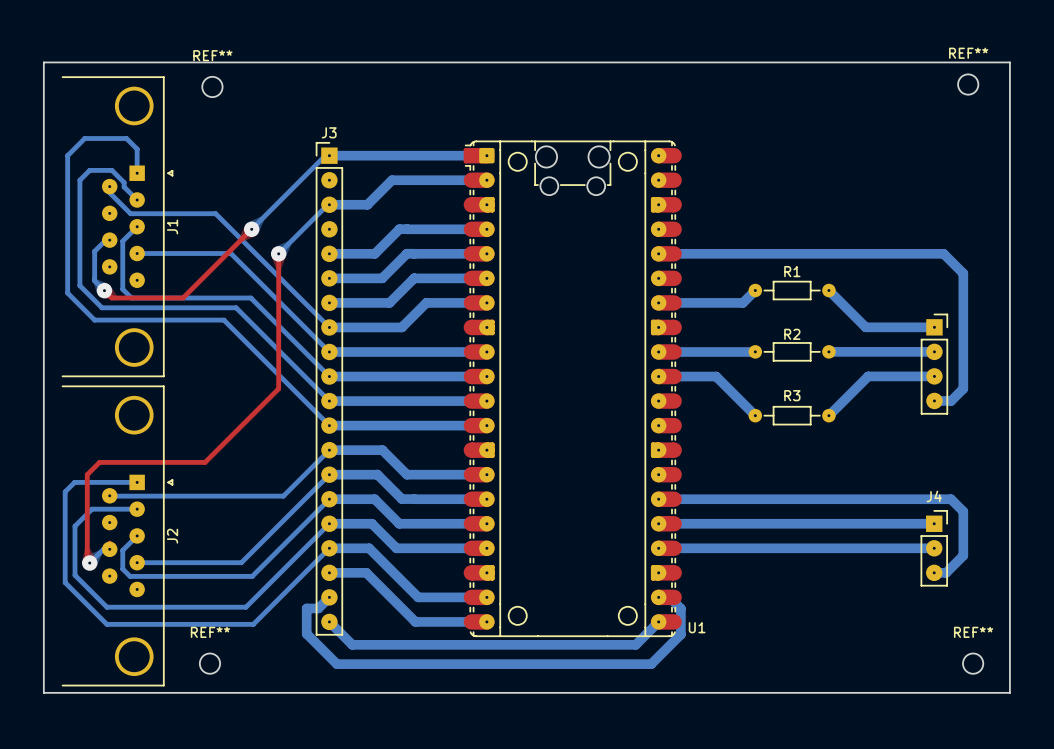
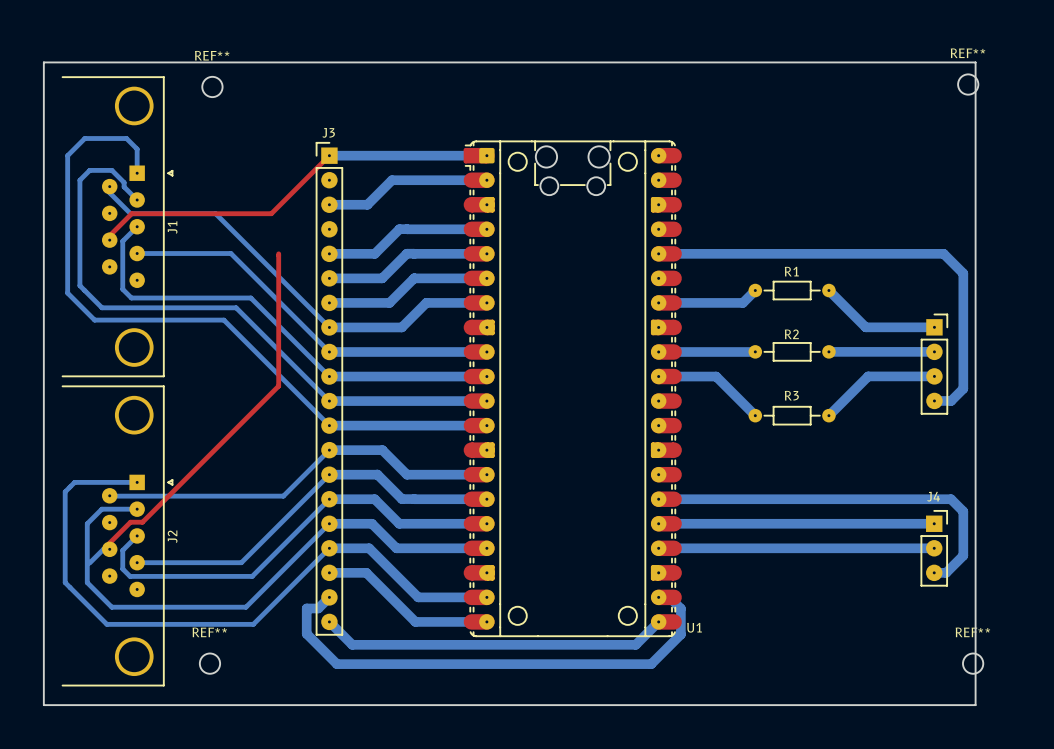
board edge: (975, 62) (1009, 62) (1009, 692) (43, 692) -> (975, 62) (975, 705) (43, 705) (43, 692)
bottom track: (329, 155) (325, 155) (251, 229) -> none
top track: none -> (329, 155) (271, 213) (131, 213) (109, 235)
bottom track: (329, 204) (276, 256) -> none
top track: (251, 229) (182, 298) (111, 298) (104, 290) -> none
via: (251, 229) -> none
bottom track: (109, 240) (105, 240) (94, 251) (94, 280) (102, 288) -> none
via: (278, 253) -> none
via: (104, 290) -> none
top track: (278, 386) (278, 388) (205, 462) (99, 462) (87, 474) (87, 560) (89, 563) -> (278, 386) (142, 522) (130, 522) (109, 543)
bottom track: (101, 509) (92, 509) (75, 526) (75, 575) (106, 607) (111, 607) -> (101, 509) (87, 523) (87, 582) (111, 607)
via: (89, 563) -> none

